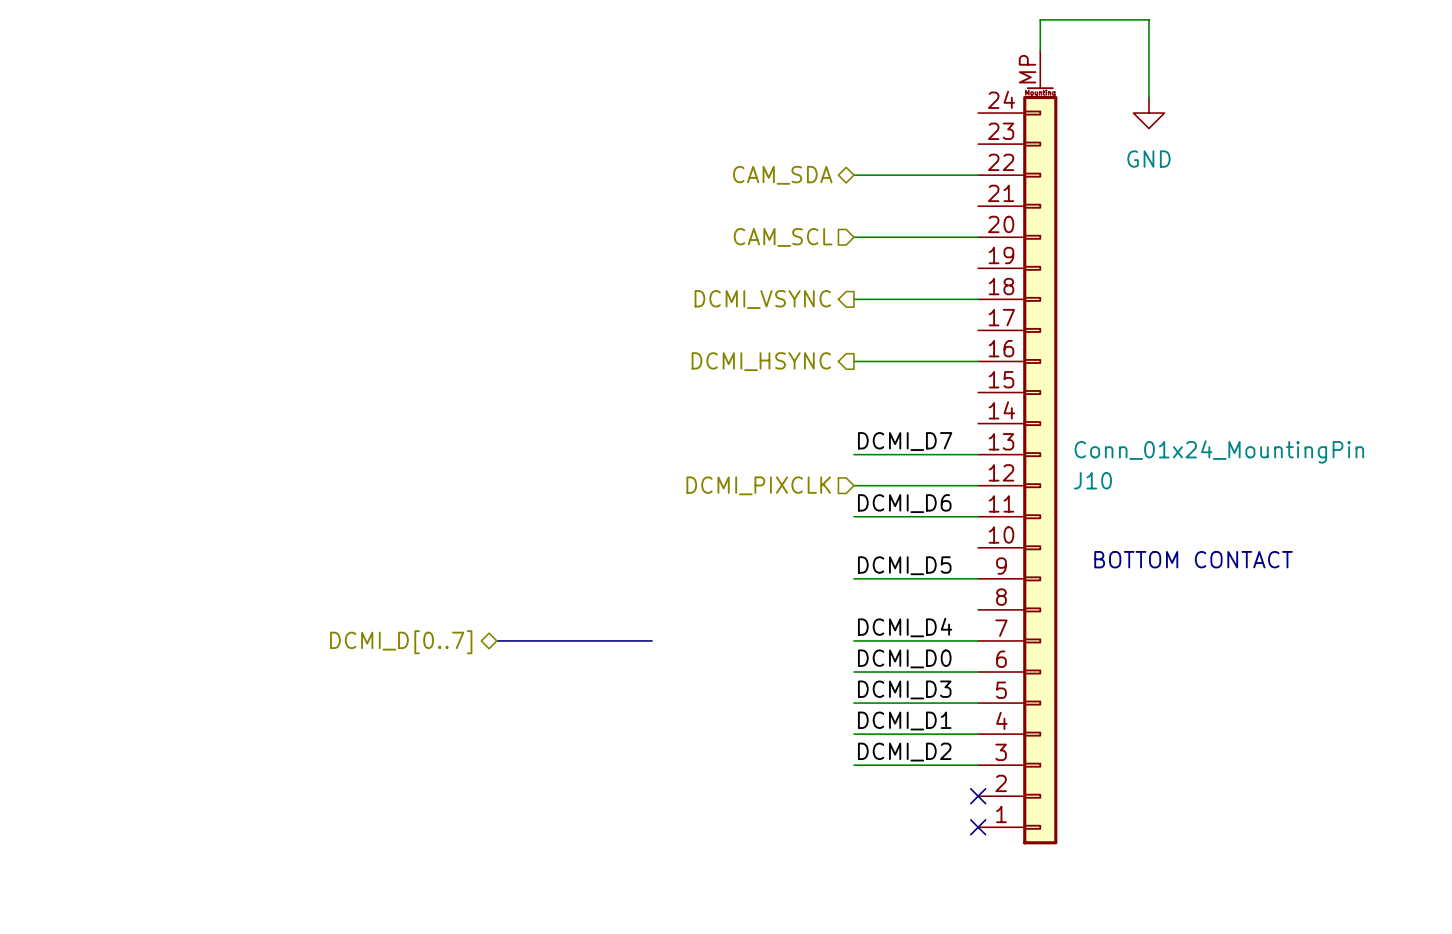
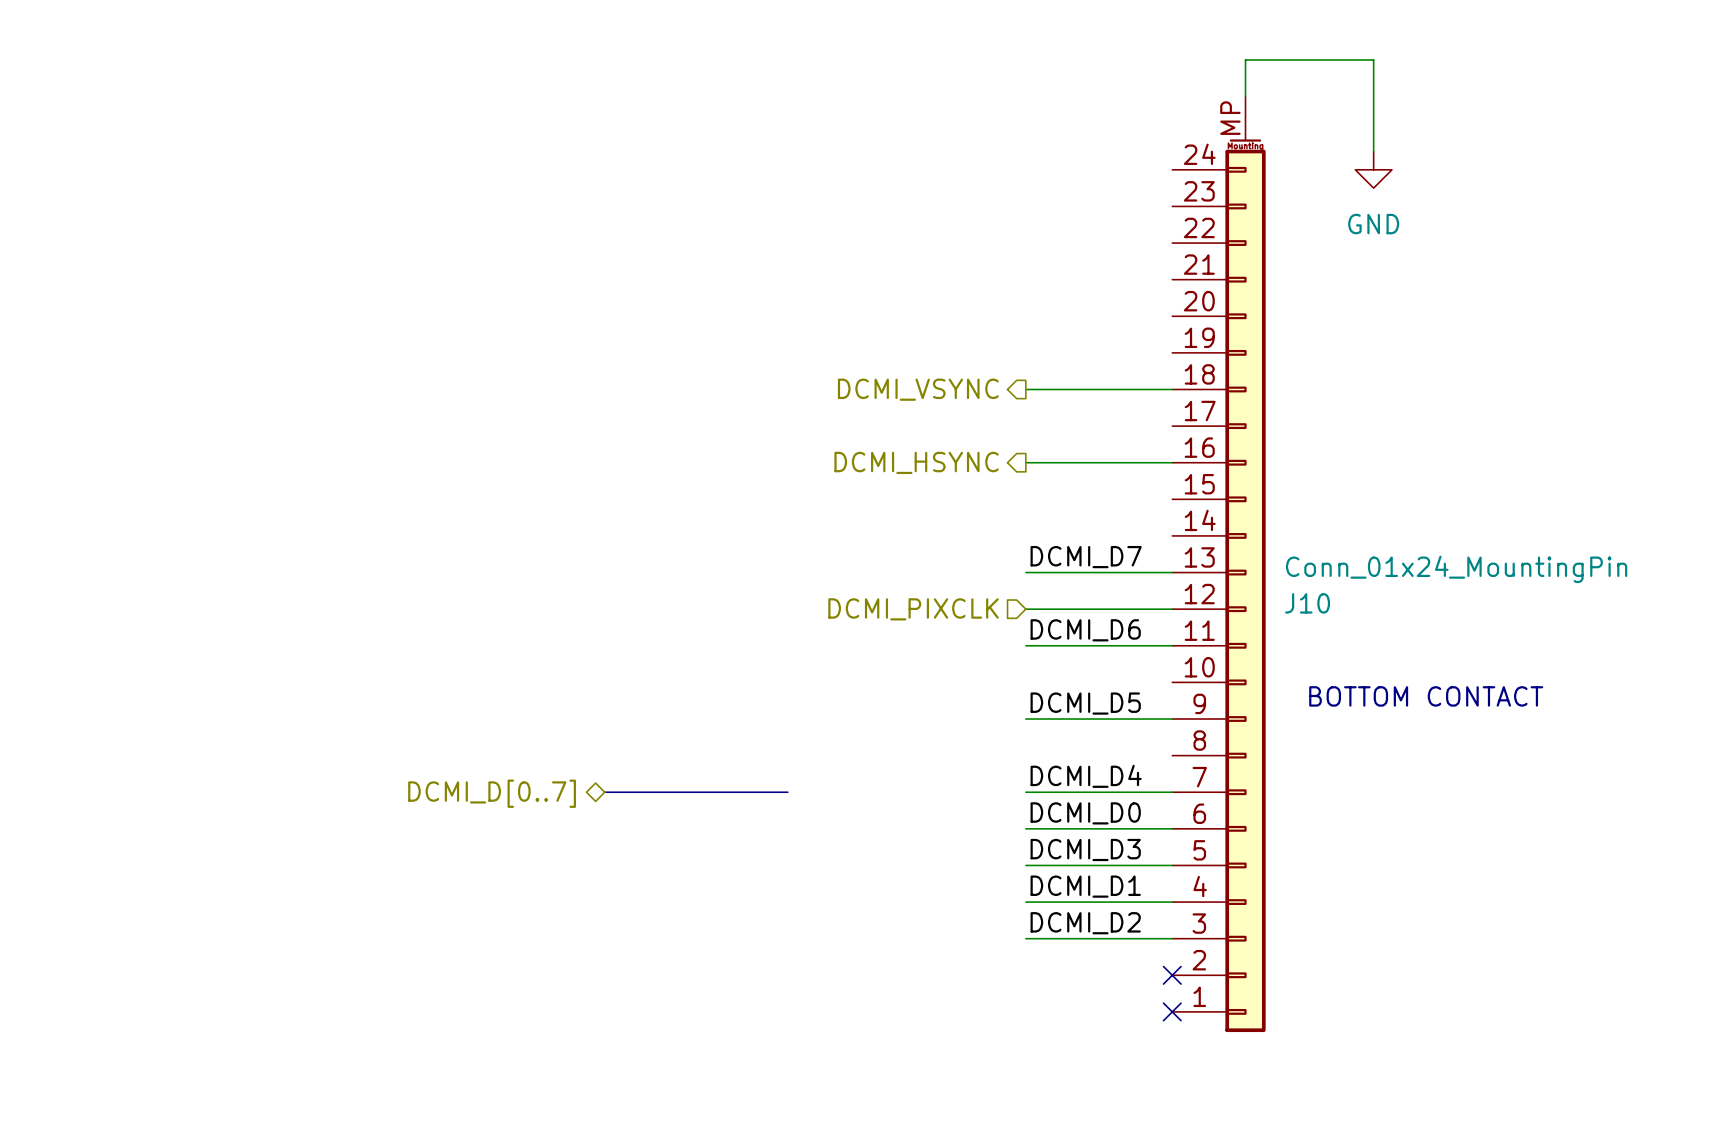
hierarchical label: CAM_SDA (782, 175) -> none
wire: (853, 175) (978, 175) -> none
hierarchical label: CAM_SCL (783, 237) -> none
wire: (853, 237) (978, 237) -> none

